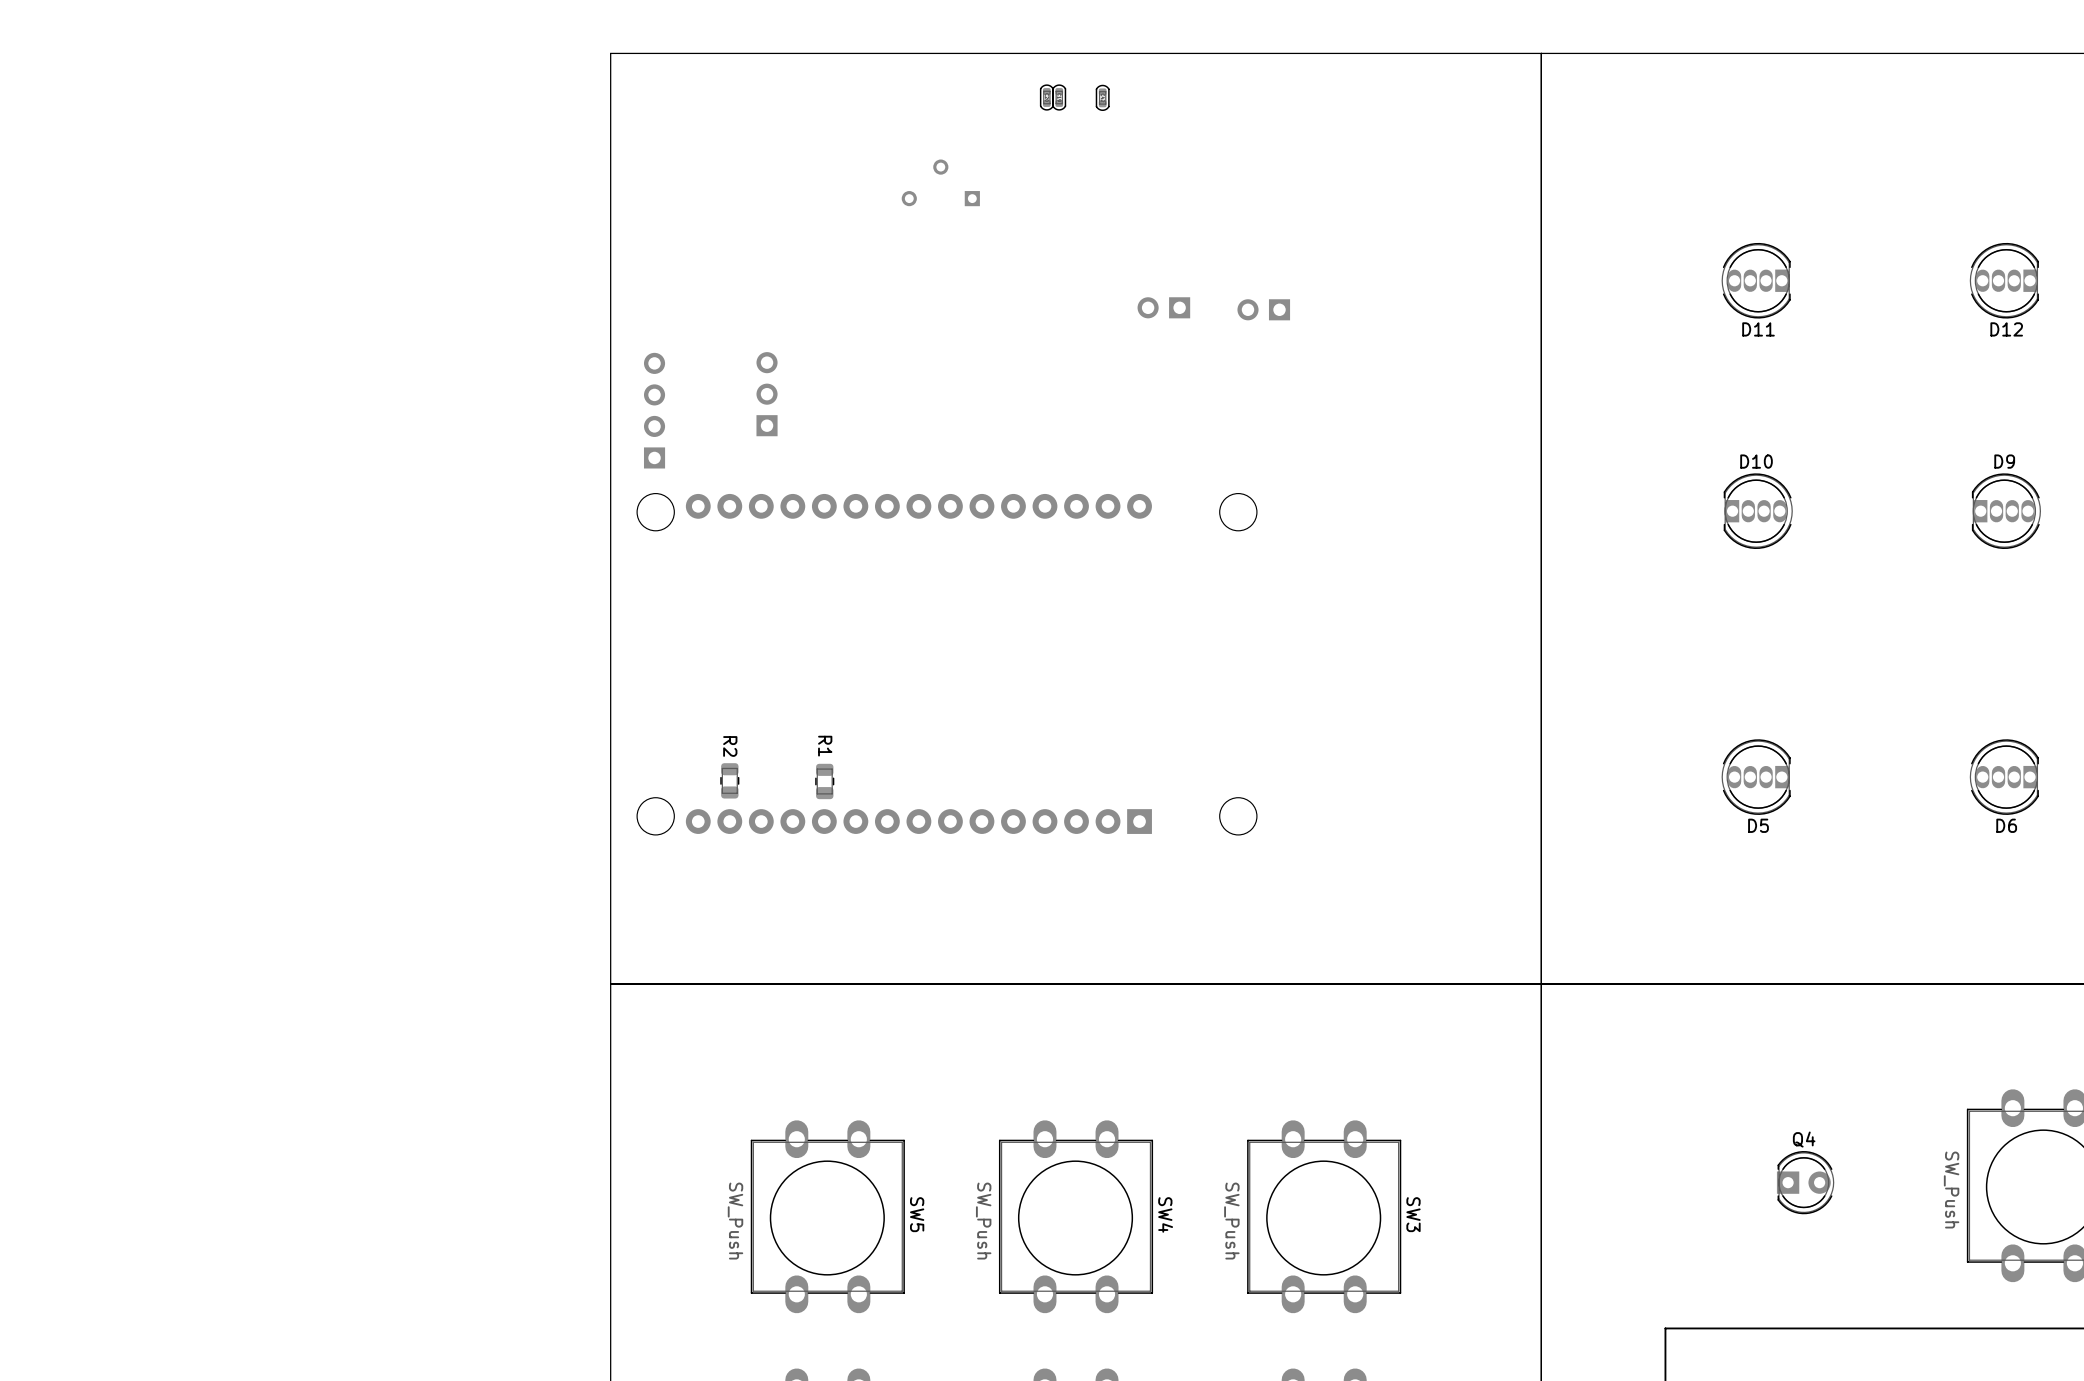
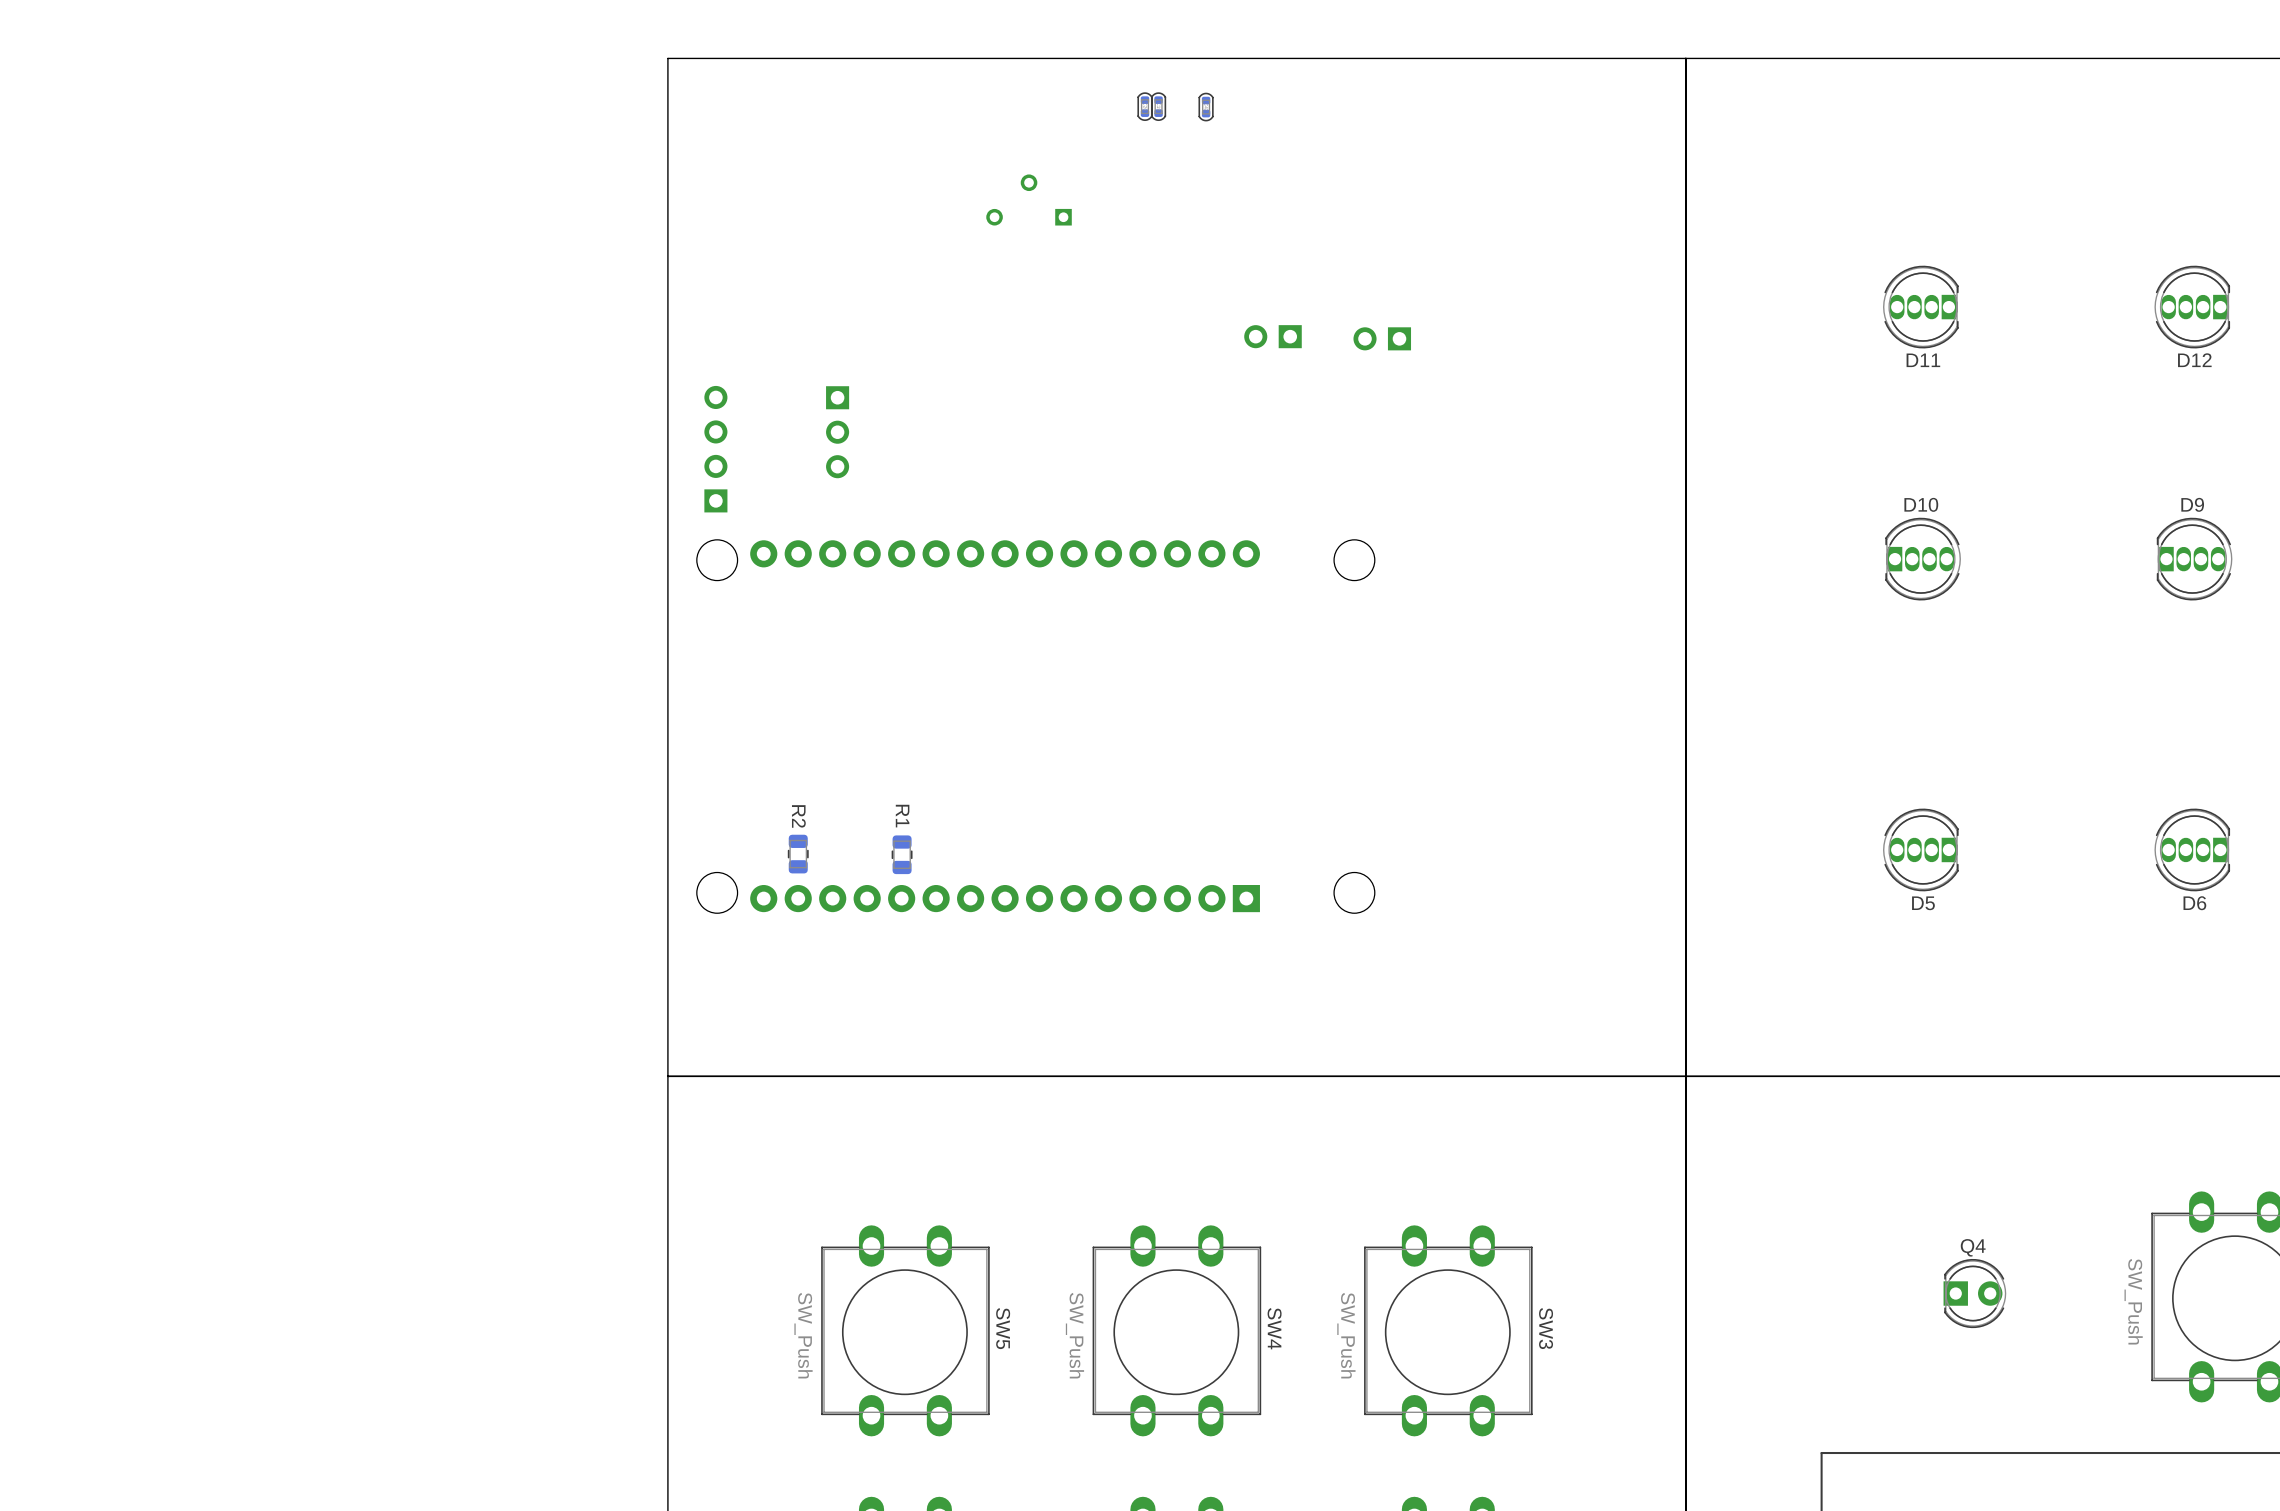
part rotation: 0° (767, 394) -> 180° (837, 432)

